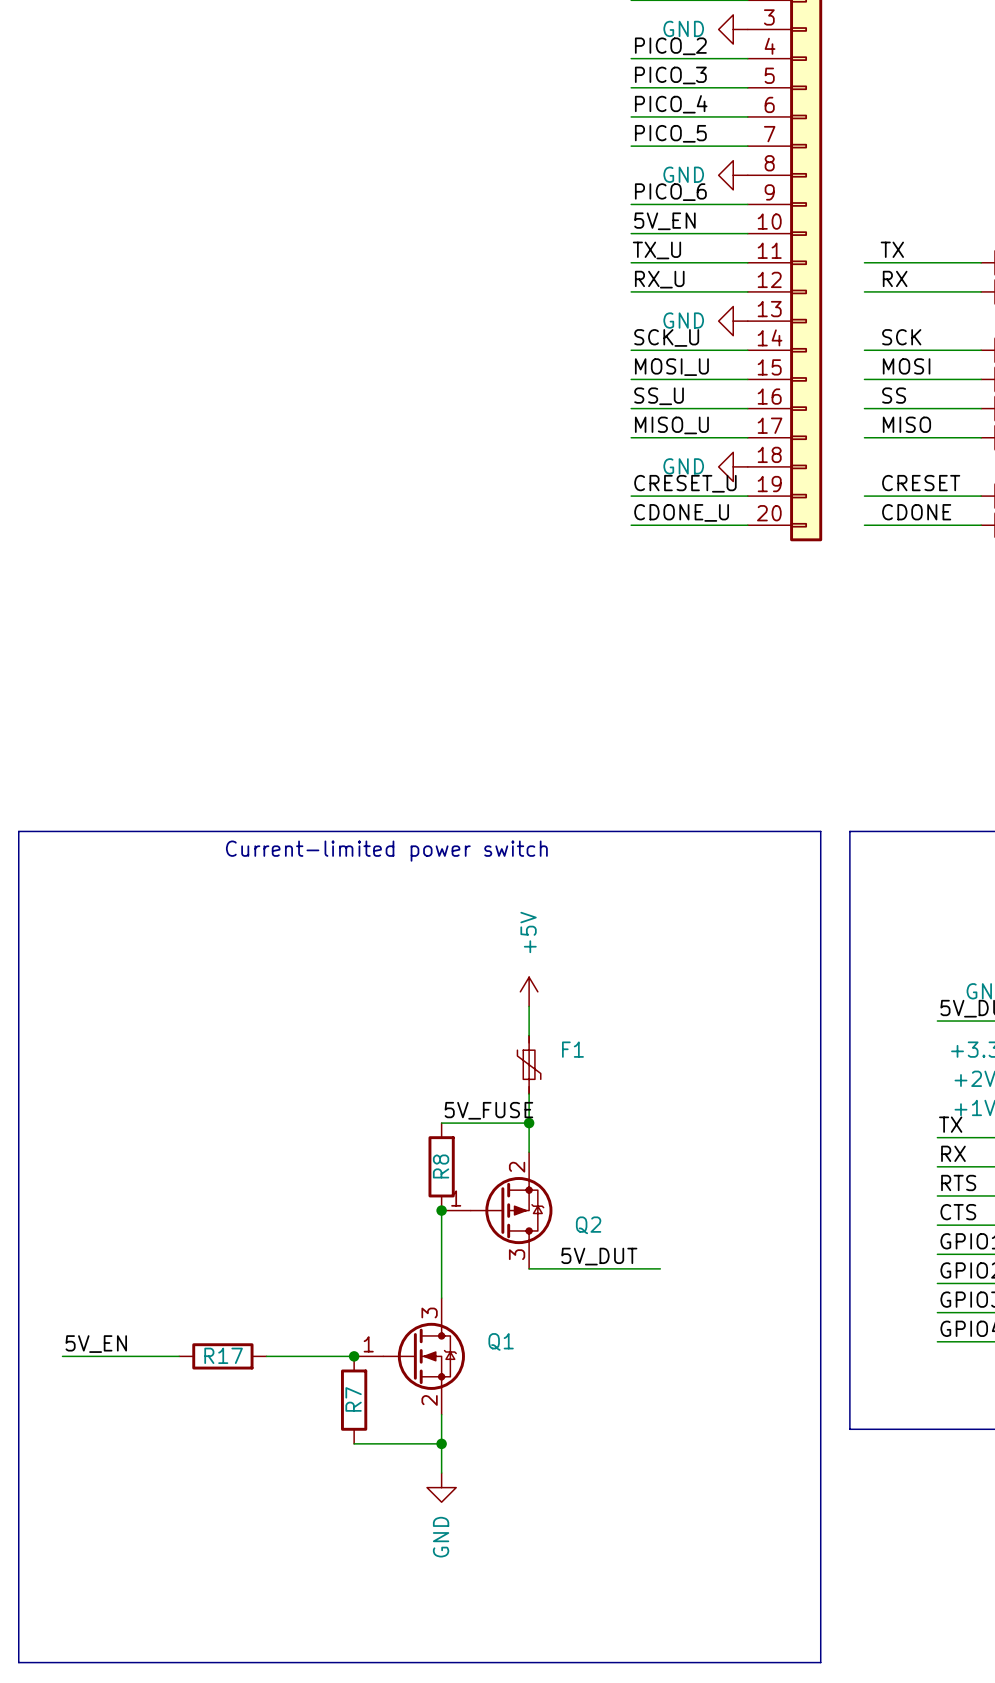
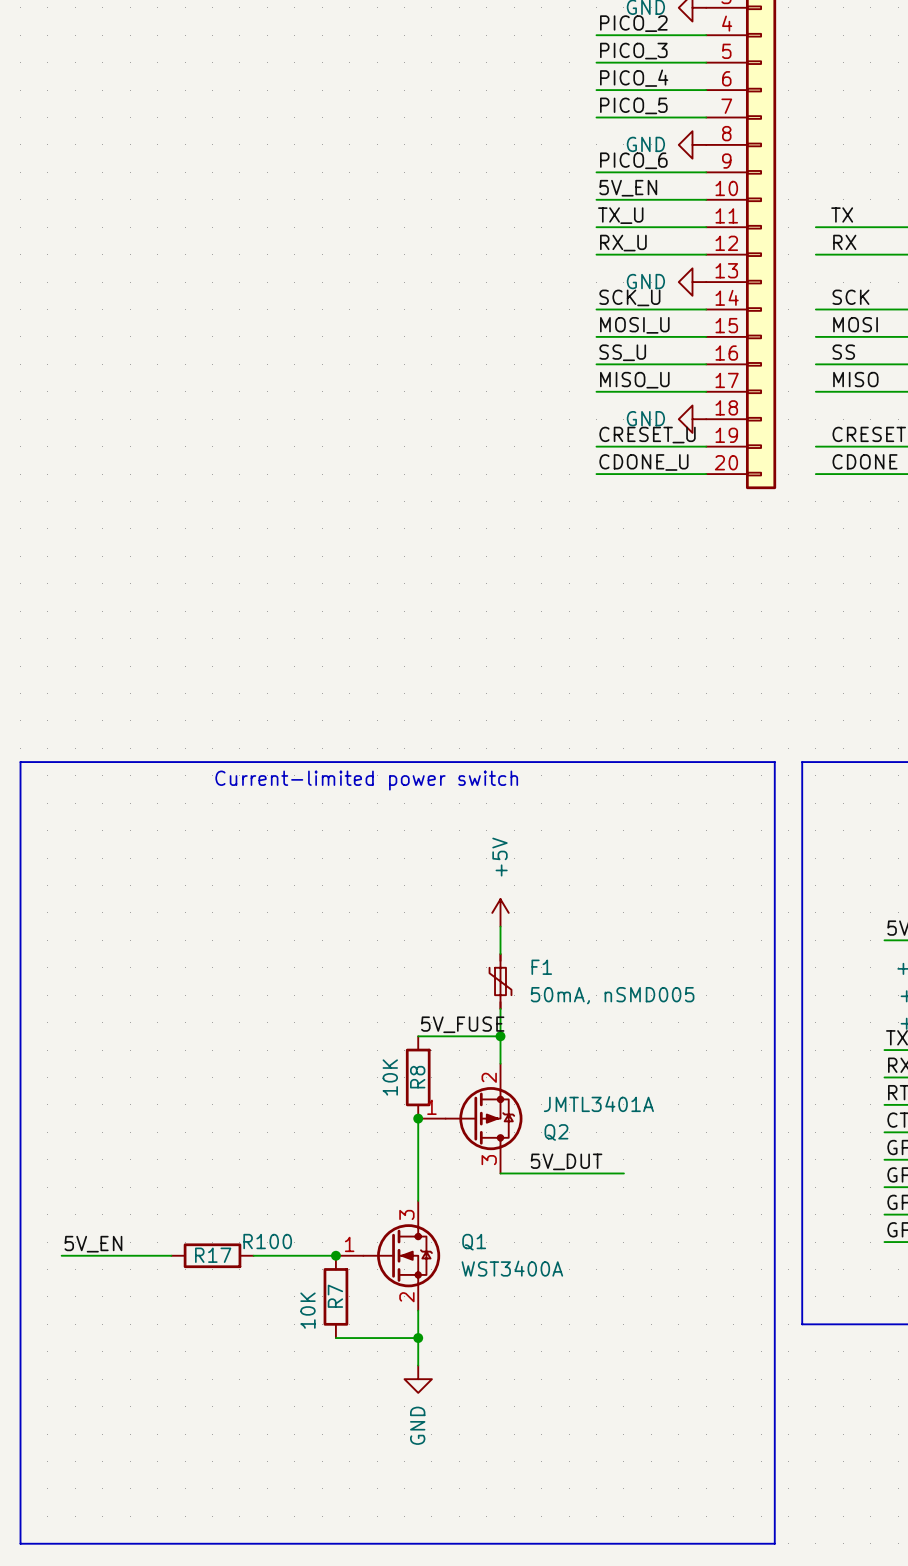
F1 value: none -> 50mA, nSMD005 (612, 995)
R8 value: none -> 10K (390, 1077)
Q2 value: none -> JMTL3401A (598, 1104)
R17 value: none -> R100 (267, 1241)
Q1 value: none -> WST3400A (512, 1268)
R7 value: none -> 10K (308, 1310)

